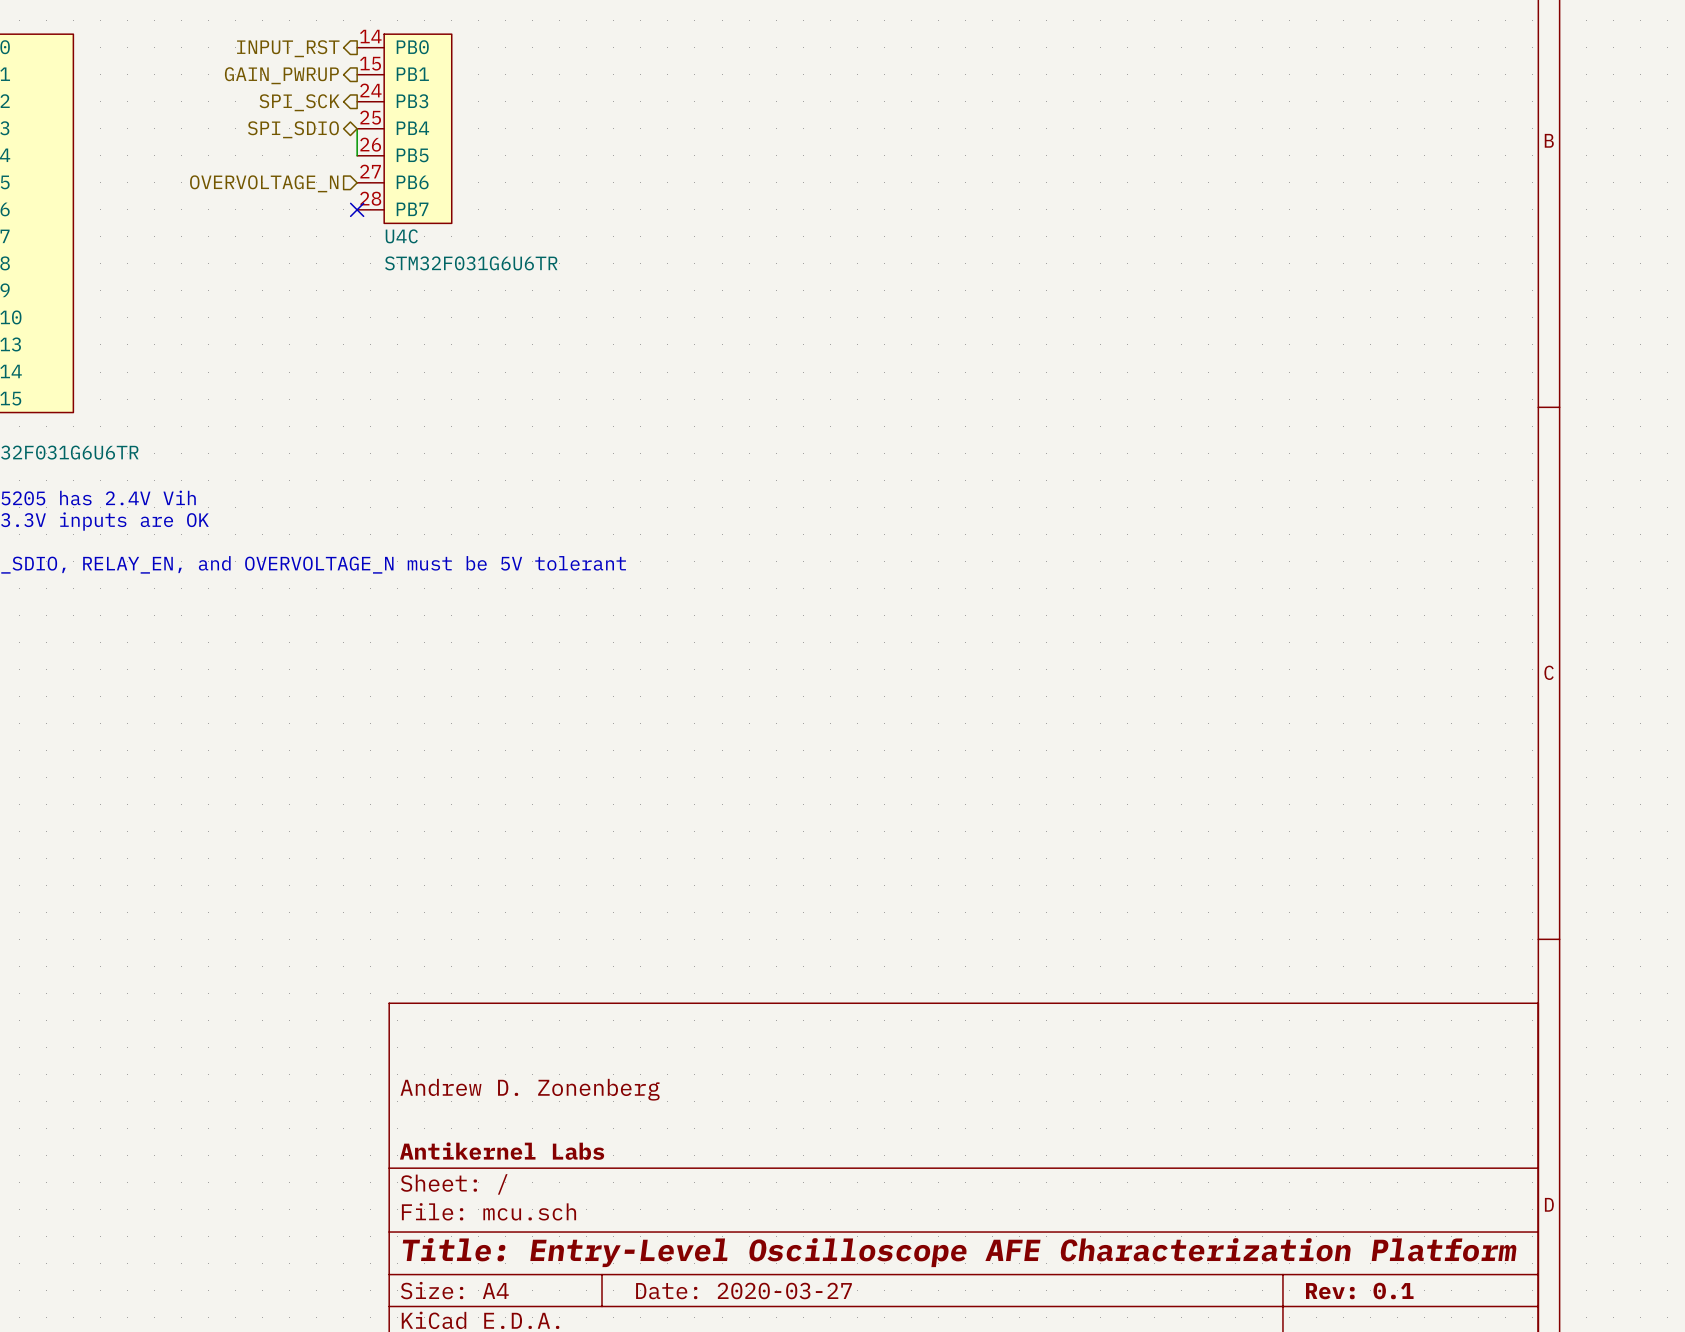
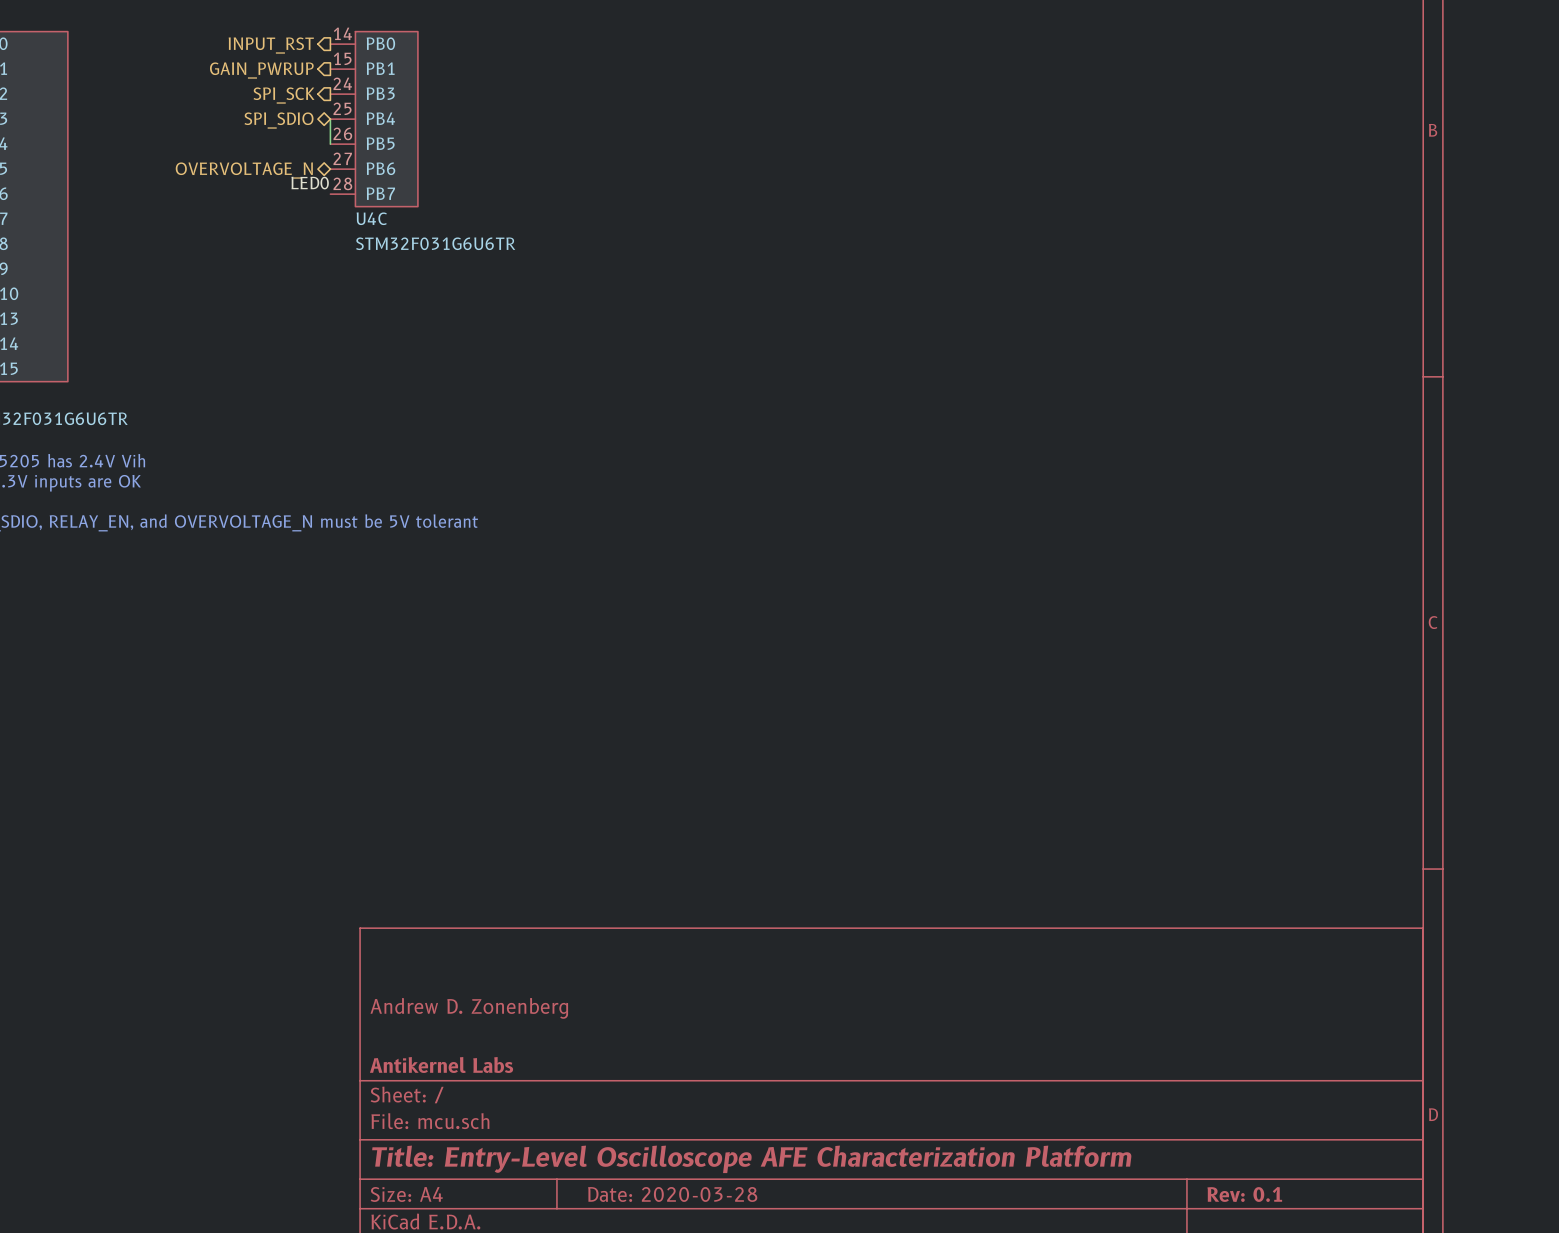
hierarchical label shape: input (264, 183) -> bidirectional (244, 170)
label: none -> LED0 (310, 183)
no-connect mark: (357, 209) -> none
title block: Date: 2020-03-27 (743, 1291) -> Date: 2020-03-28 (672, 1194)

